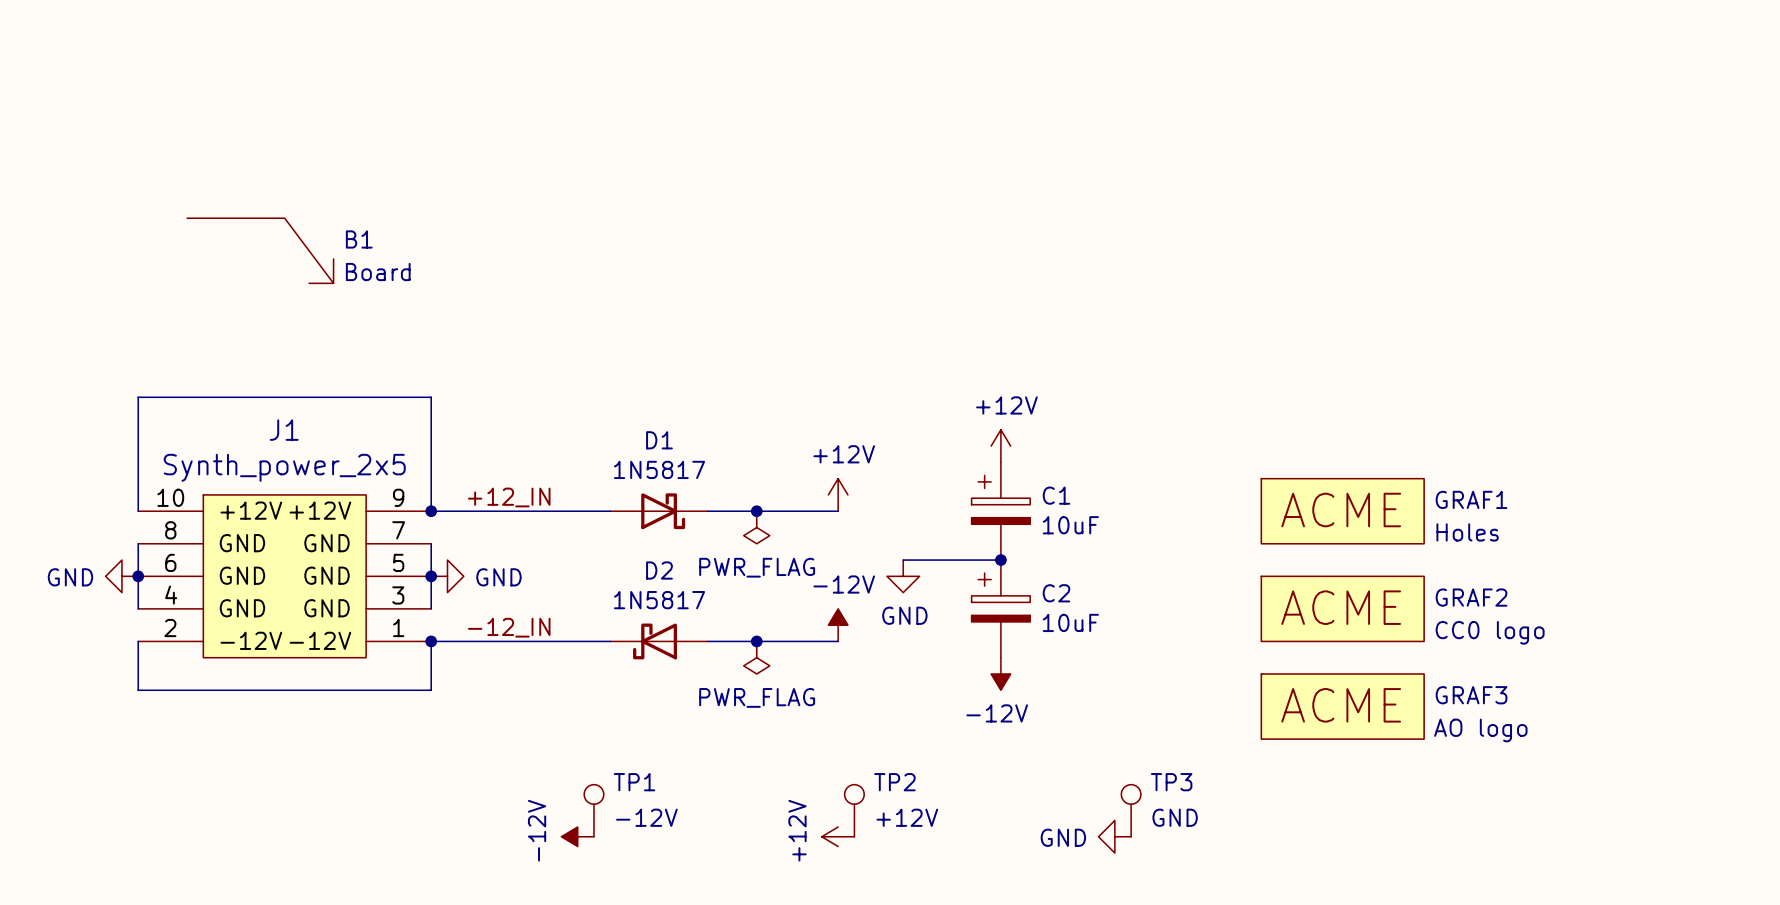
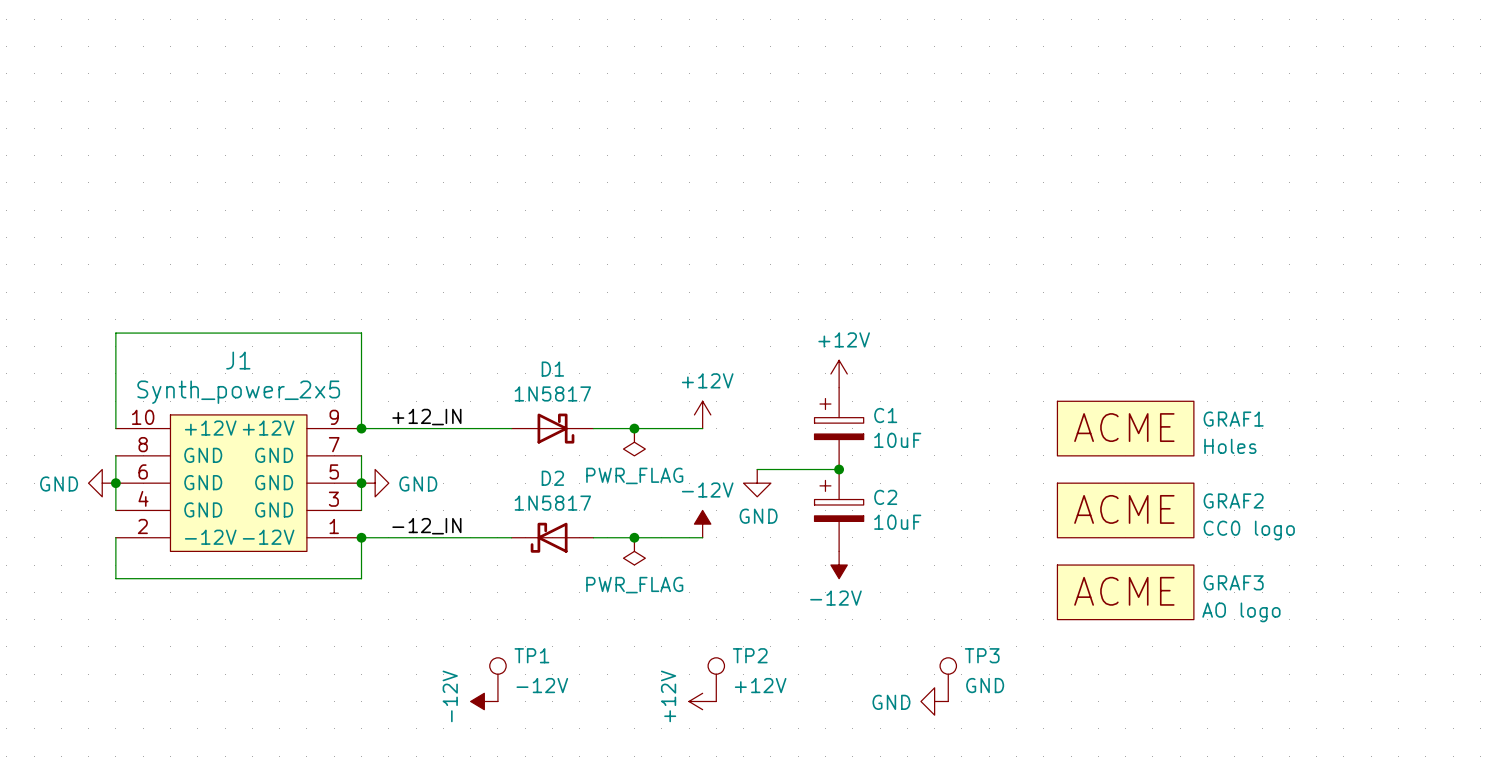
B1: Board (260, 250) -> none

